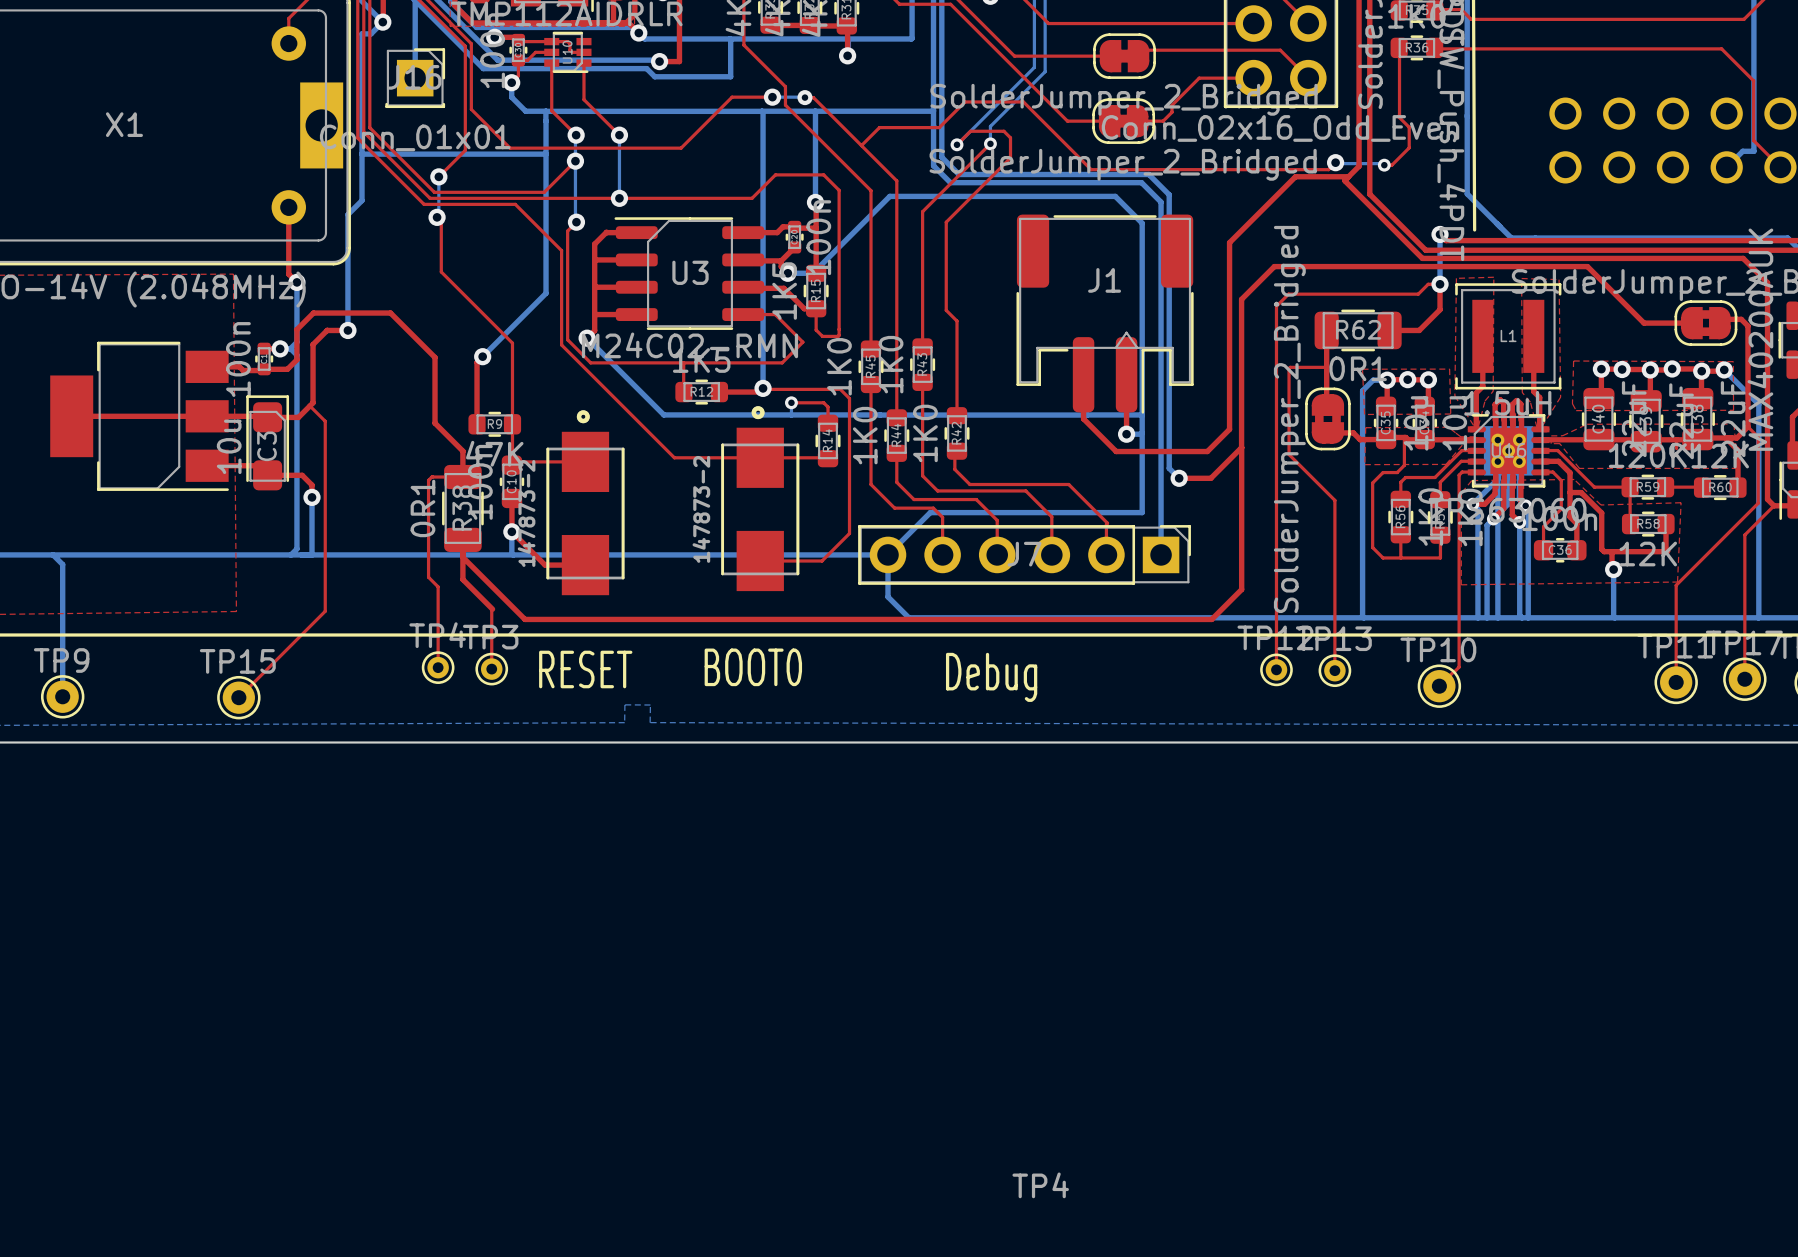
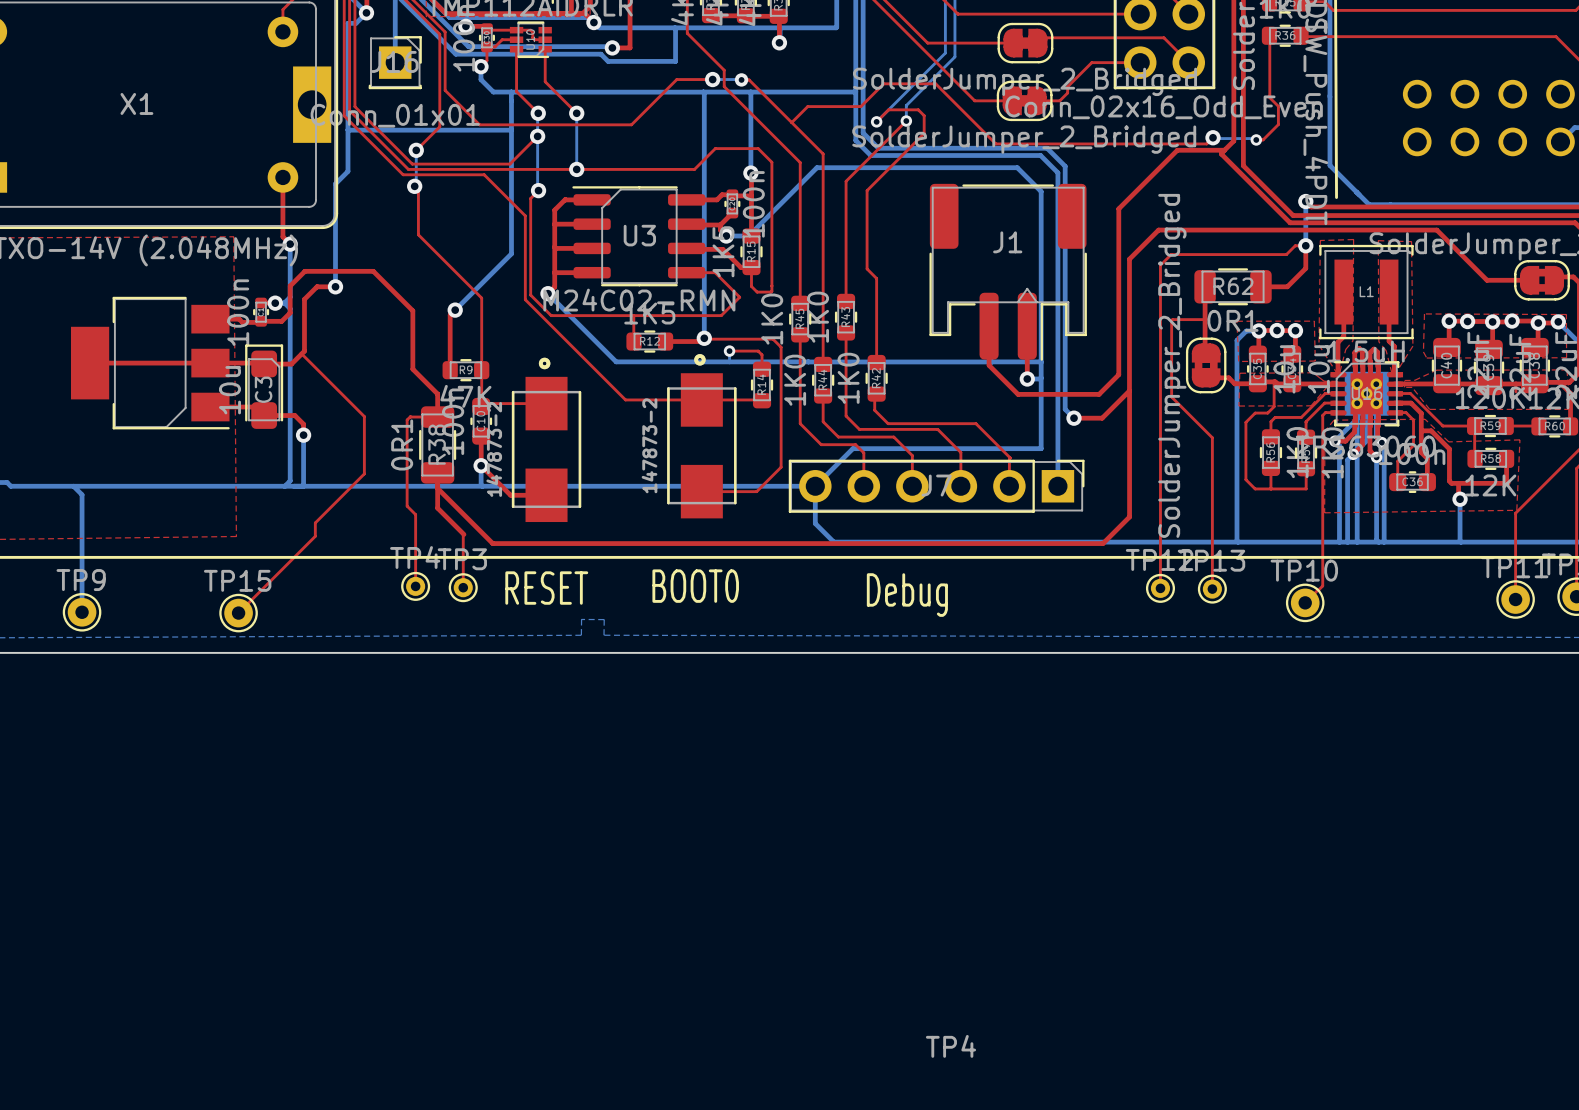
top track: (325, 421) (325, 596) -> (315, 367) (364, 416) (364, 473) (315, 522)

